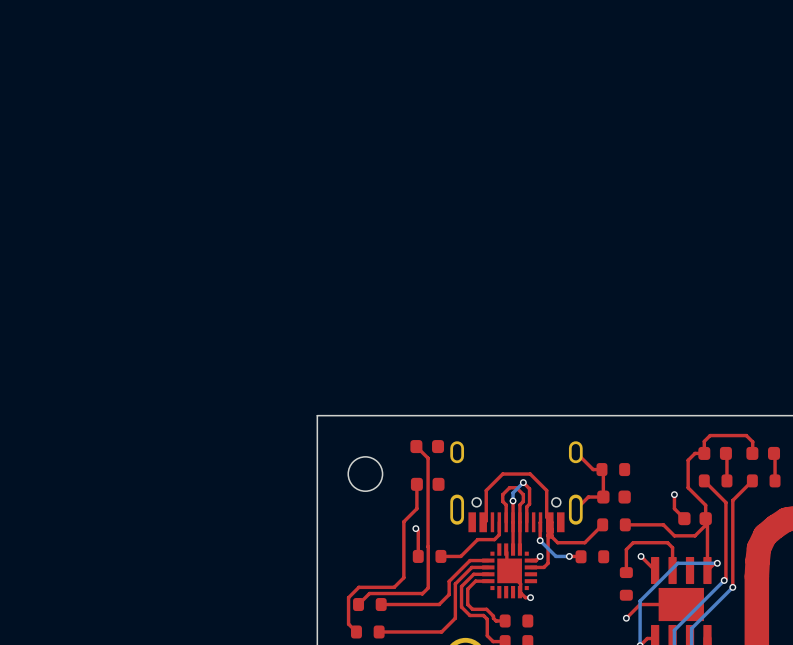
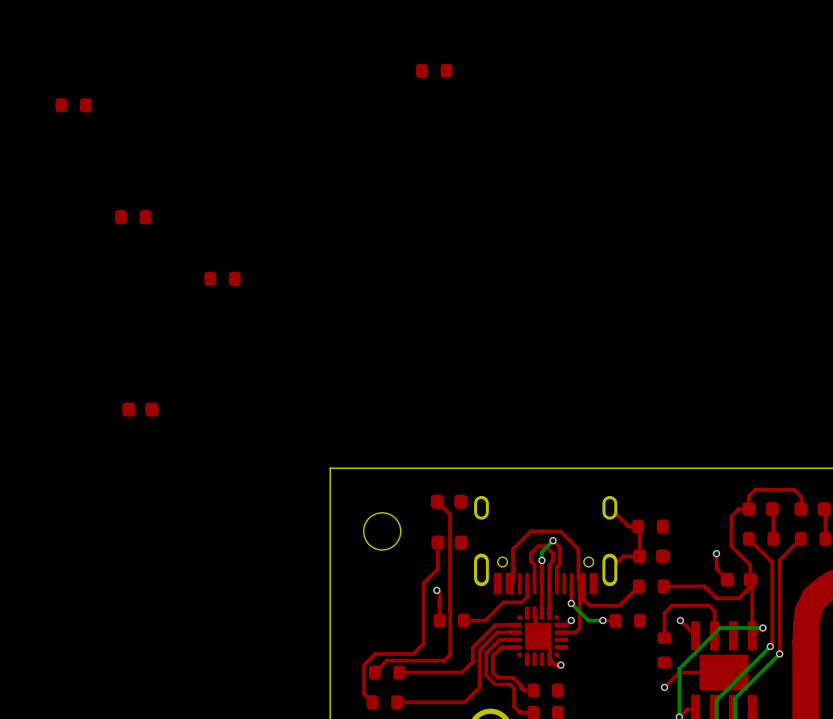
part: none -> (434, 70)
part: none -> (73, 105)
part: none -> (133, 217)
part: none -> (222, 278)
part: none -> (140, 409)

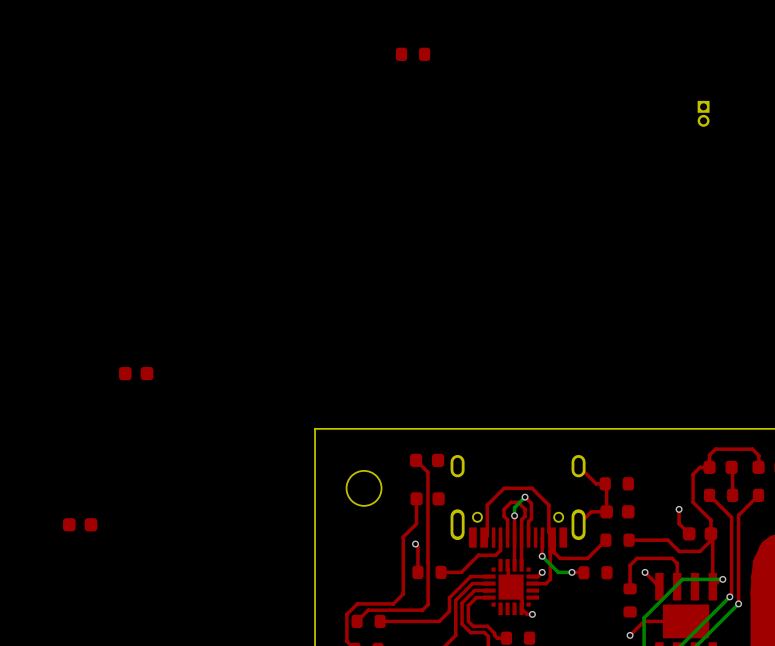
part: (73, 105) -> none
part: none -> (703, 113)
part: (133, 217) -> none
part: (222, 278) -> none
part: none -> (80, 524)

